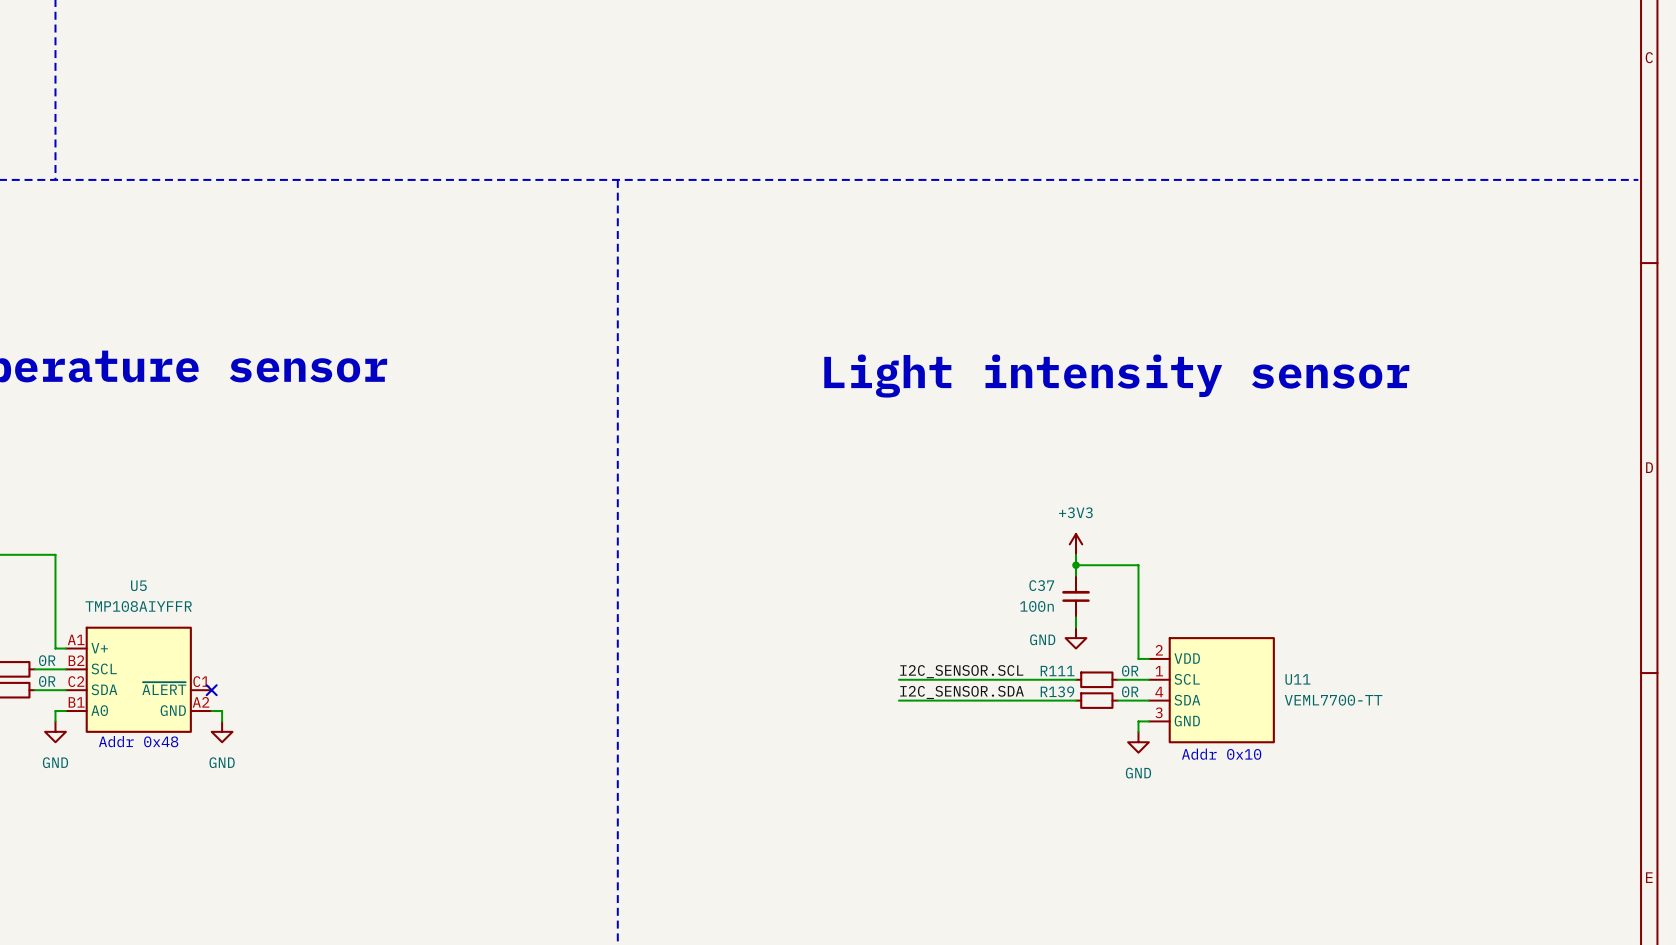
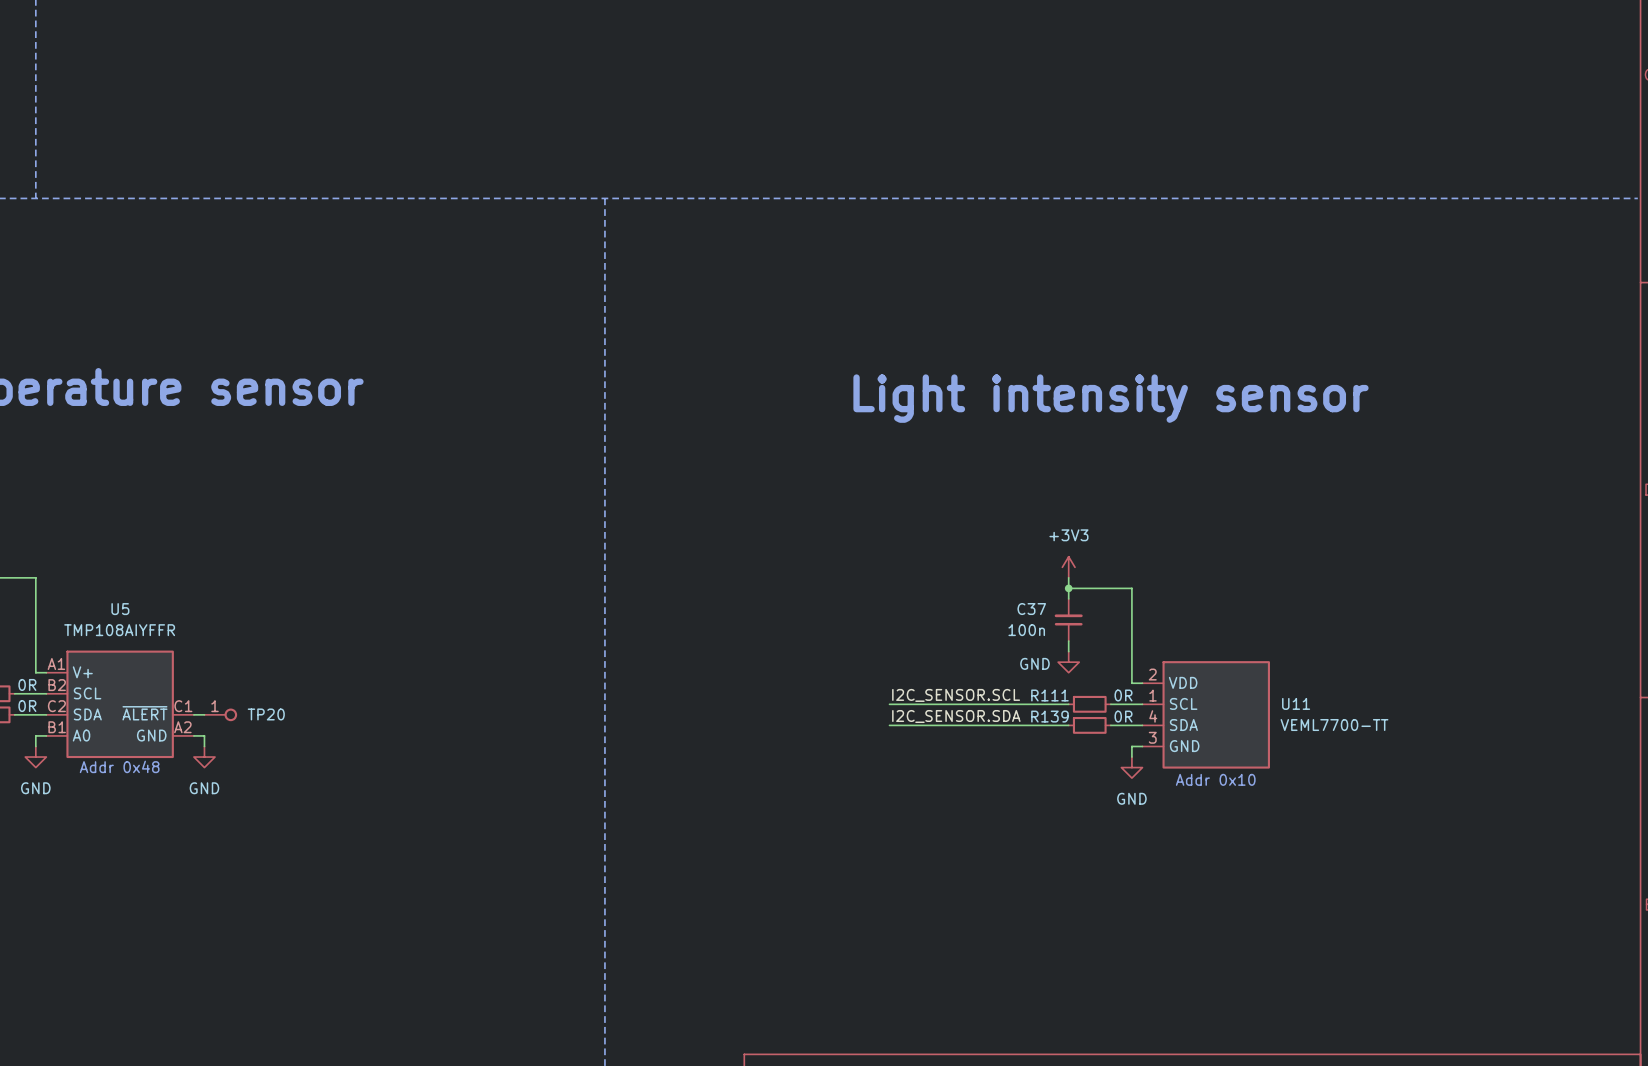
wire: none -> (193, 714) (204, 714)
no-connect mark: (211, 690) -> none
TP20: none -> (220, 714)

